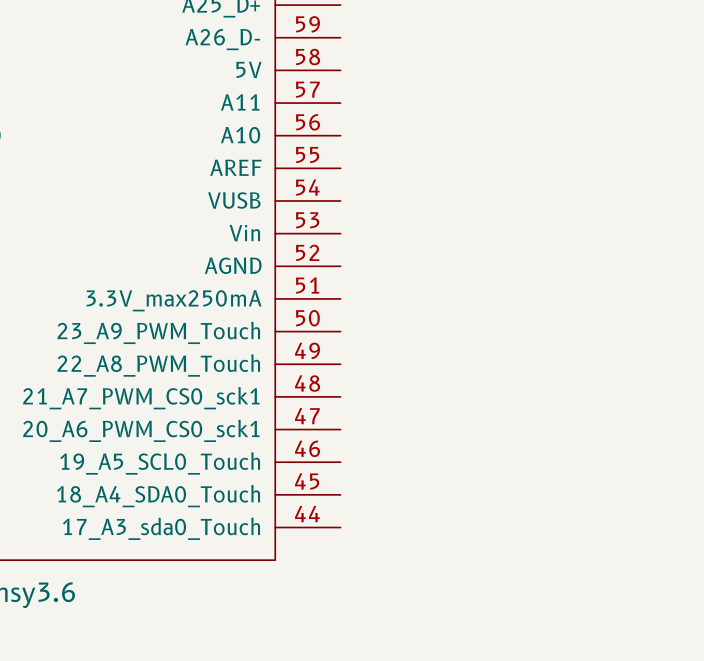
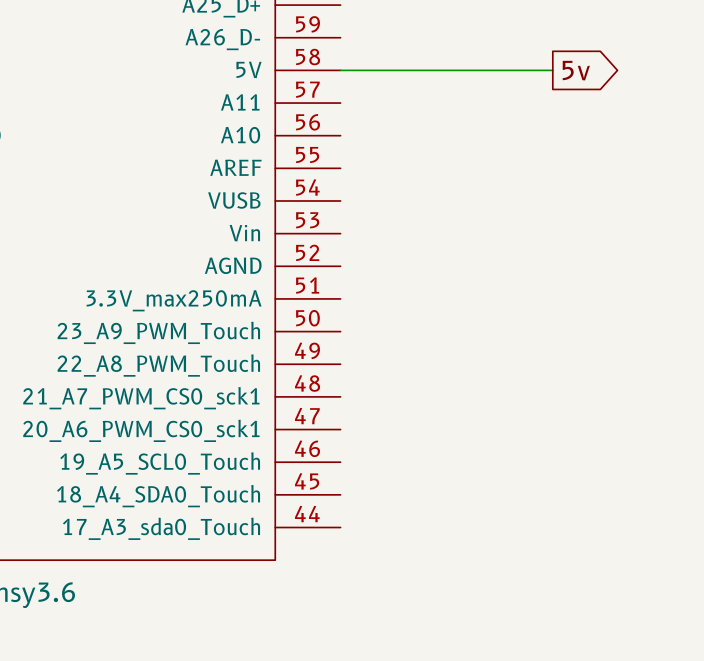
wire: none -> (340, 70) (552, 70)
global label: none -> 5v (576, 70)

